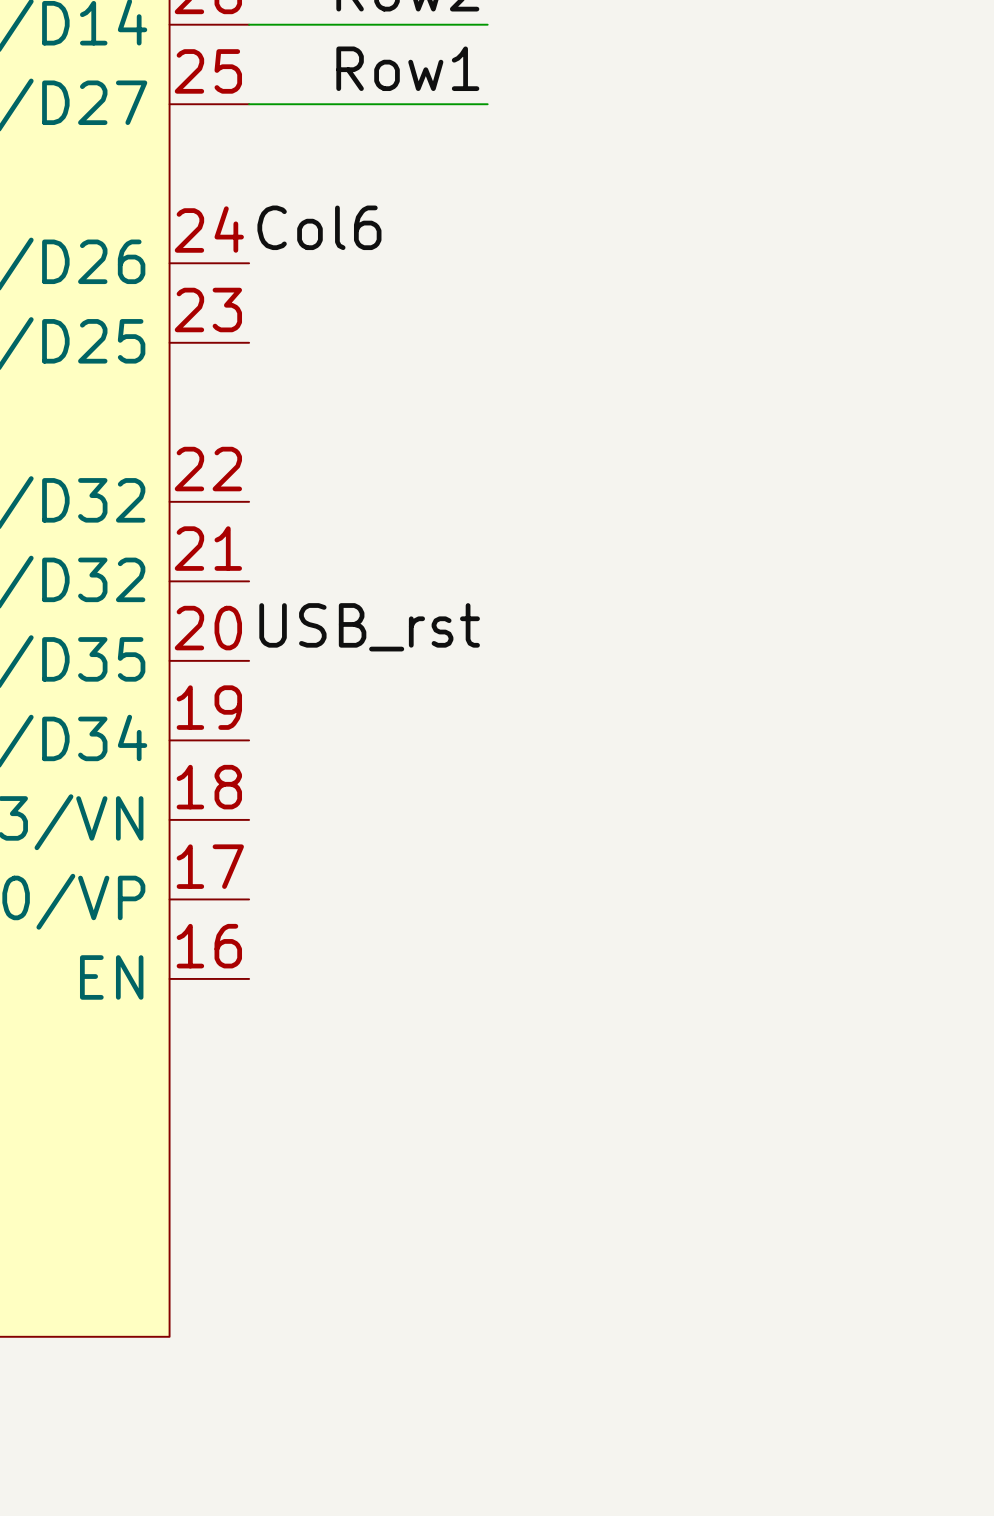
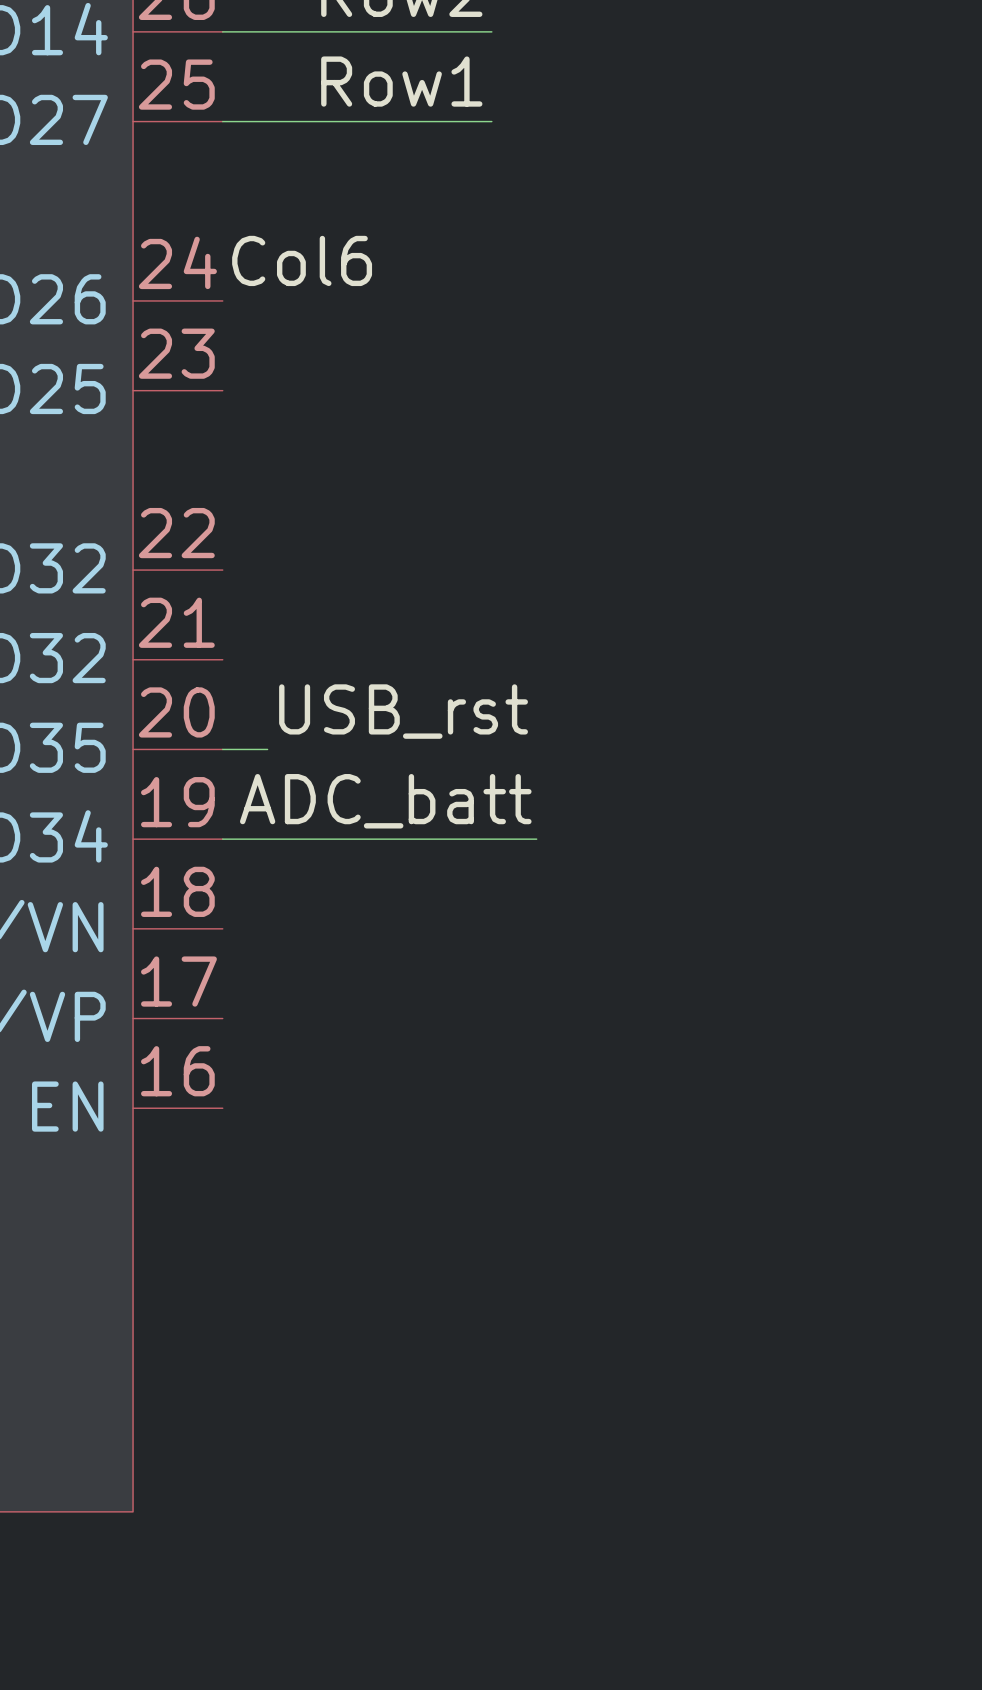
label position: USB_rst (369, 627) -> USB_rst (403, 711)
wire: none -> (222, 749) (267, 749)
label: none -> ADC_batt (385, 801)
wire: none -> (222, 839) (536, 839)

